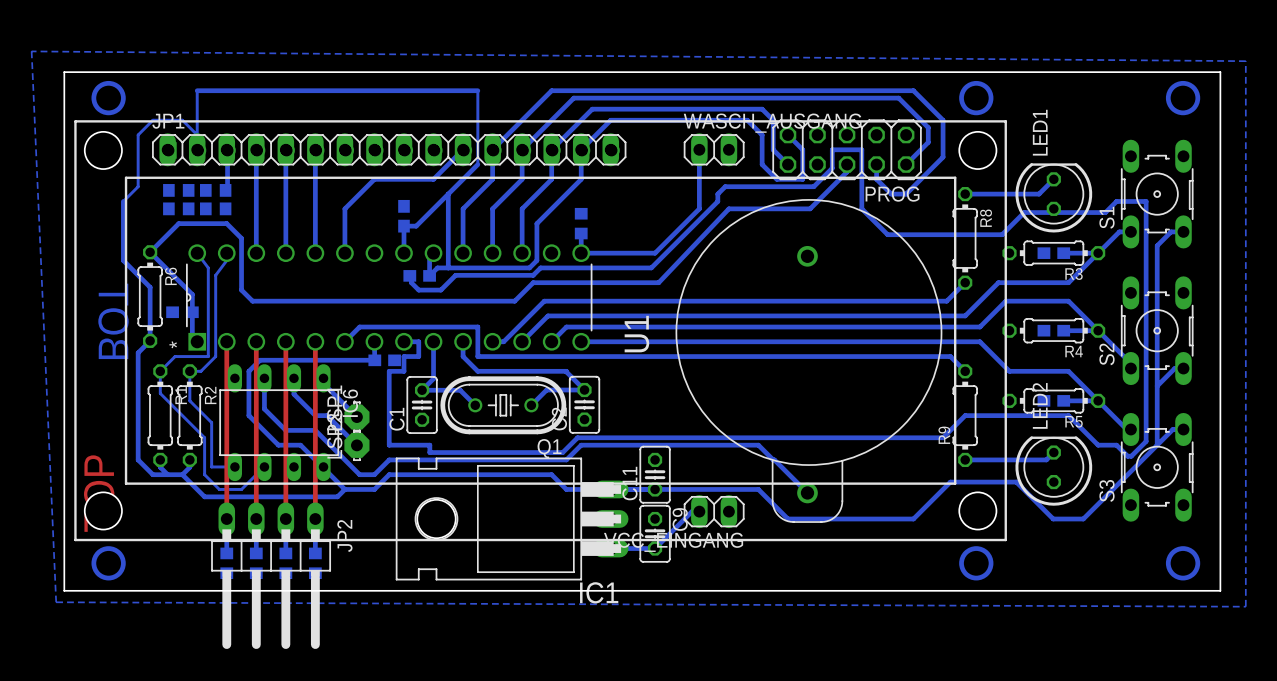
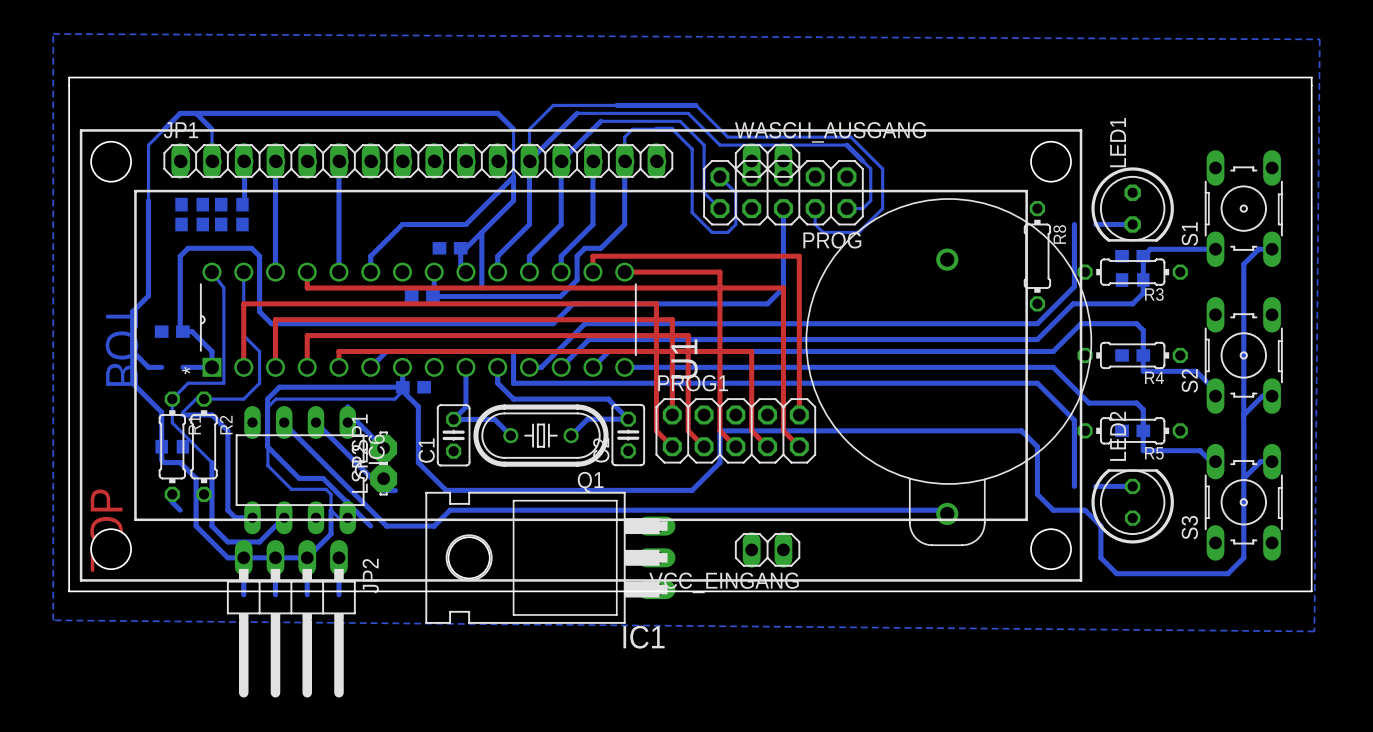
bottom zone outline: (31, 51) (1245, 61) (1245, 606) (56, 602) (31, 51) -> (53, 34) (53, 620) (1314, 631) (1319, 39) (53, 34)
drawing: [91, 80, 126, 116] -> none
drawing: [959, 80, 994, 116] -> none
drawing: [1165, 80, 1201, 116] -> none
bottom track: (573, 98) (559, 112) -> (616, 105) (553, 105) (529, 129) (529, 160)
bottom track: (647, 98) (898, 98) (928, 127) (928, 142) (906, 164) -> (696, 105) (727, 137) (850, 137) (882, 168) (882, 208) (858, 232) (823, 232) (815, 224) (815, 208)
bottom track: none -> (196, 113) (211, 129)
bottom track: (536, 105) (551, 90) (913, 90) (943, 120) (943, 157) (906, 194) (891, 194) (876, 179) (876, 164) -> (577, 113) (688, 113) (719, 145) (846, 145)
bottom track: none -> (600, 121) (680, 121) (704, 145) (704, 192) (719, 208)
bottom track: (152, 120) (182, 120) (197, 135) -> none
bottom track: (197, 120) (197, 90) (477, 90) (477, 120) -> (164, 129) (180, 113) (497, 113) (513, 129)
bottom track: (610, 120) (581, 149) -> (656, 129) (632, 129) (624, 137) (624, 160)
bottom track: (625, 120) (747, 120) (762, 135) (762, 164) (776, 179) (802, 179) (802, 149) -> (672, 129) (692, 149) (692, 212) (712, 232) (727, 232) (735, 224) (735, 192) (719, 176)
bottom track: (463, 149) (433, 179) (374, 179) (344, 208) (344, 238) -> none
bottom track: (551, 149) (592, 109) (762, 109) (773, 120) (773, 149) (787, 164) -> none
bottom track: (699, 149) (699, 208) (655, 253) (581, 253) (581, 233) -> none
bottom track: none -> (862, 160) (870, 168) (870, 200) (862, 208) (846, 208)
PROG: (847, 149) -> none
bottom track: (286, 150) (285, 253) -> none
LED1 footprint: [1015, 163, 1093, 233] -> [1091, 167, 1174, 242]
bottom track: none -> (513, 176) (513, 200) (465, 248) (460, 248) (460, 266) (465, 272)
bottom track: (847, 164) (847, 171) (810, 208) (728, 208) (658, 282) -> (783, 208) (783, 287) (767, 303) (708, 303)
bottom track: (492, 179) (463, 208) (463, 238) -> (529, 192) (529, 224) (497, 256)
bottom track: (522, 179) (492, 208) (492, 238) -> (561, 192) (561, 224) (529, 256)
bottom track: (551, 179) (522, 208) (522, 238) -> none
bottom track: (581, 179) (551, 208) -> (592, 192) (592, 224)
bottom track: none -> (624, 192) (624, 224) (600, 248) (585, 248) (577, 256)
PROG: none -> (783, 192)
bottom track: (1053, 179) (1039, 194) (965, 194) -> none
bottom track: (138, 186) (123, 201) (123, 260) (150, 287) (150, 340) (138, 352) (138, 459) (152, 474) (182, 474) -> (148, 200) (148, 295) (132, 311) (132, 383) (161, 412) (161, 459) (164, 462) (180, 462) (196, 478) (196, 526) (227, 557) (307, 557) (331, 534) (331, 510)
bottom track: (448, 194) (448, 216) -> none
bottom track: (433, 208) (416, 226) (403, 226) (403, 253) -> (465, 224) (402, 224) (370, 256)
part rotation: 0° (403, 216) -> 90° clockwise (450, 248)
part position: (403, 216) -> (450, 248)
bottom track: (536, 223) (536, 238) -> (577, 240) (561, 256)
part: (581, 223) -> none
bottom track: (234, 231) (226, 223) (178, 223) (150, 252) (192, 294) (192, 336) (197, 341) -> (251, 248) (188, 248) (180, 256) (180, 328) (182, 331) (192, 331) (211, 351) (211, 367) (182, 367)
bottom track: (1119, 231) (1068, 282) (1053, 282) -> (1203, 249) (1150, 249) (1143, 256) (1143, 293) (1132, 303)
top track: none -> (307, 272) (307, 287) (783, 287) (783, 430) (799, 446)
bottom track: (433, 253) (429, 257) (429, 275) (437, 267) (529, 267) -> (434, 272) (433, 296) (560, 296) (569, 287)
top track: none -> (592, 272) (592, 256) (799, 256) (799, 414)
top track: none -> (624, 272) (719, 272) (719, 430) (735, 446)
part position: (1053, 253) -> (1132, 256)
bottom track: (1063, 253) (1098, 253) -> (1095, 224) (1132, 224)
bottom track: (226, 260) (215, 275) (215, 356) (200, 371) -> (243, 280) (243, 335) (259, 351) (259, 383) (243, 399) (215, 399)
part: none -> (1132, 280)
part: none -> (422, 295)
bottom track: (409, 275) (411, 282) (418, 290) (440, 290) (455, 275) (533, 275) (540, 267) (651, 267) (717, 201) (717, 194) (725, 186) (813, 186) (832, 168) (832, 149) (861, 149) (861, 208) (887, 234) (1002, 234) (1024, 212) (1105, 212) (1116, 201) (1146, 201) (1146, 441) (1131, 456) (1127, 456) (1116, 445) (1098, 445) (1068, 415) (965, 415) (943, 437) (577, 437) (562, 452) (429, 452) (429, 445) (389, 445) (389, 430) -> none
part: (419, 275) -> none
bottom track: (965, 282) (946, 301) -> (1074, 224) (1074, 286) (1037, 323) (1017, 323)
R6: (150, 296) -> none
bottom track: (1057, 301) (1068, 301) (1112, 345) -> (1136, 323) (1143, 330) (1143, 371) (1196, 371)
part position: (182, 312) -> (172, 331)
bottom track: none -> (132, 351) (148, 367) (161, 367)
bottom track: (1063, 330) (1098, 330) -> none
top track: (226, 341) (226, 519) -> (243, 367) (243, 303) (656, 303) (656, 430) (672, 446)
top track: (256, 341) (256, 519) -> (275, 367) (275, 319) (672, 319) (672, 414)
top track: (285, 341) (285, 519) -> (307, 367) (307, 335) (688, 335) (688, 430) (704, 446)
top track: (315, 341) (315, 519) -> (338, 367) (338, 351) (751, 351) (751, 430) (767, 446)
bottom track: (403, 341) (418, 341) (418, 356) (403, 356) (403, 371) (389, 371) (389, 378) -> (331, 510) (331, 494) (326, 489) (291, 489) (267, 465) (267, 407) (275, 399) (394, 399) (402, 391) (418, 406)
bottom track: (950, 356) (965, 371) -> (1021, 383) (1037, 383) (1074, 420) (1074, 486)
part position: (808, 360) -> (948, 372)
IC6 footprint: [219, 364, 340, 482] -> [235, 406, 365, 535]
bottom track: (189, 371) (189, 400) (211, 422) (211, 466) (234, 466) -> (204, 399) (196, 399) (182, 412) (182, 414) (211, 414) (227, 430) (227, 510) (235, 517) (252, 517)
bottom track: (1009, 371) (1068, 371) (1116, 419) -> (1085, 399) (1089, 403) (1136, 403) (1143, 409) (1143, 450) (1200, 450)
bottom track: (293, 378) (293, 394) (315, 415) (327, 415) (356, 445) -> none
bottom track: none -> (315, 422) (384, 490) (395, 490)
bottom track: (264, 394) (264, 409) (285, 430) (315, 430) (359, 474) (374, 474) (389, 459) (566, 459) (581, 445) (758, 445) (807, 492) -> (284, 423) (386, 526)
PROG1: none -> (735, 430)
bottom track: (1063, 400) (1098, 400) -> none
part: none -> (172, 446)
R9: (965, 415) -> none
bottom track: (197, 430) (204, 437) (204, 474) (219, 489) (241, 489) (264, 466) -> none
bottom track: (1157, 445) (1083, 519) (1053, 519) (1016, 482) (950, 482) (913, 519) (787, 519) (758, 489) (566, 489) (551, 474) -> (1243, 478) (1243, 557) (1227, 573) (1116, 573) (1100, 557) (1100, 526) (1085, 510) (1053, 510) (1037, 494) (1037, 446) (1021, 430) (719, 430) (719, 462) (692, 490) (446, 490) (418, 462)
bottom track: (1053, 452) (1046, 459) (965, 459) -> (1132, 486) (1095, 486)
bottom track: (189, 459) (189, 467) (182, 474) -> none
bottom track: (182, 474) (197, 489) -> (211, 462) (211, 526)
bottom track: none -> (331, 510) (338, 517) (347, 517)
bottom track: (418, 474) (389, 474) (374, 489) -> (450, 510) (434, 526) (402, 526)
bottom track: none -> (592, 510) (939, 510) (947, 513)
C11: (655, 474) -> none
bottom track: (359, 489) (344, 489) (337, 496) (204, 496) -> (284, 517) (259, 541) (227, 541) (219, 534)
bottom track: (699, 511) (691, 511) (655, 548) (610, 548) -> none
C9: (655, 533) -> none
drawing: [91, 546, 126, 581] -> none
drawing: [959, 546, 994, 581] -> none
drawing: [1165, 546, 1201, 581] -> none
board edge: (64, 550) (64, 590) (1220, 590) (1220, 550) -> (69, 591) (1311, 591)
part: (226, 563) -> none
part: (256, 563) -> none
part: (285, 563) -> none
part: (315, 563) -> none

